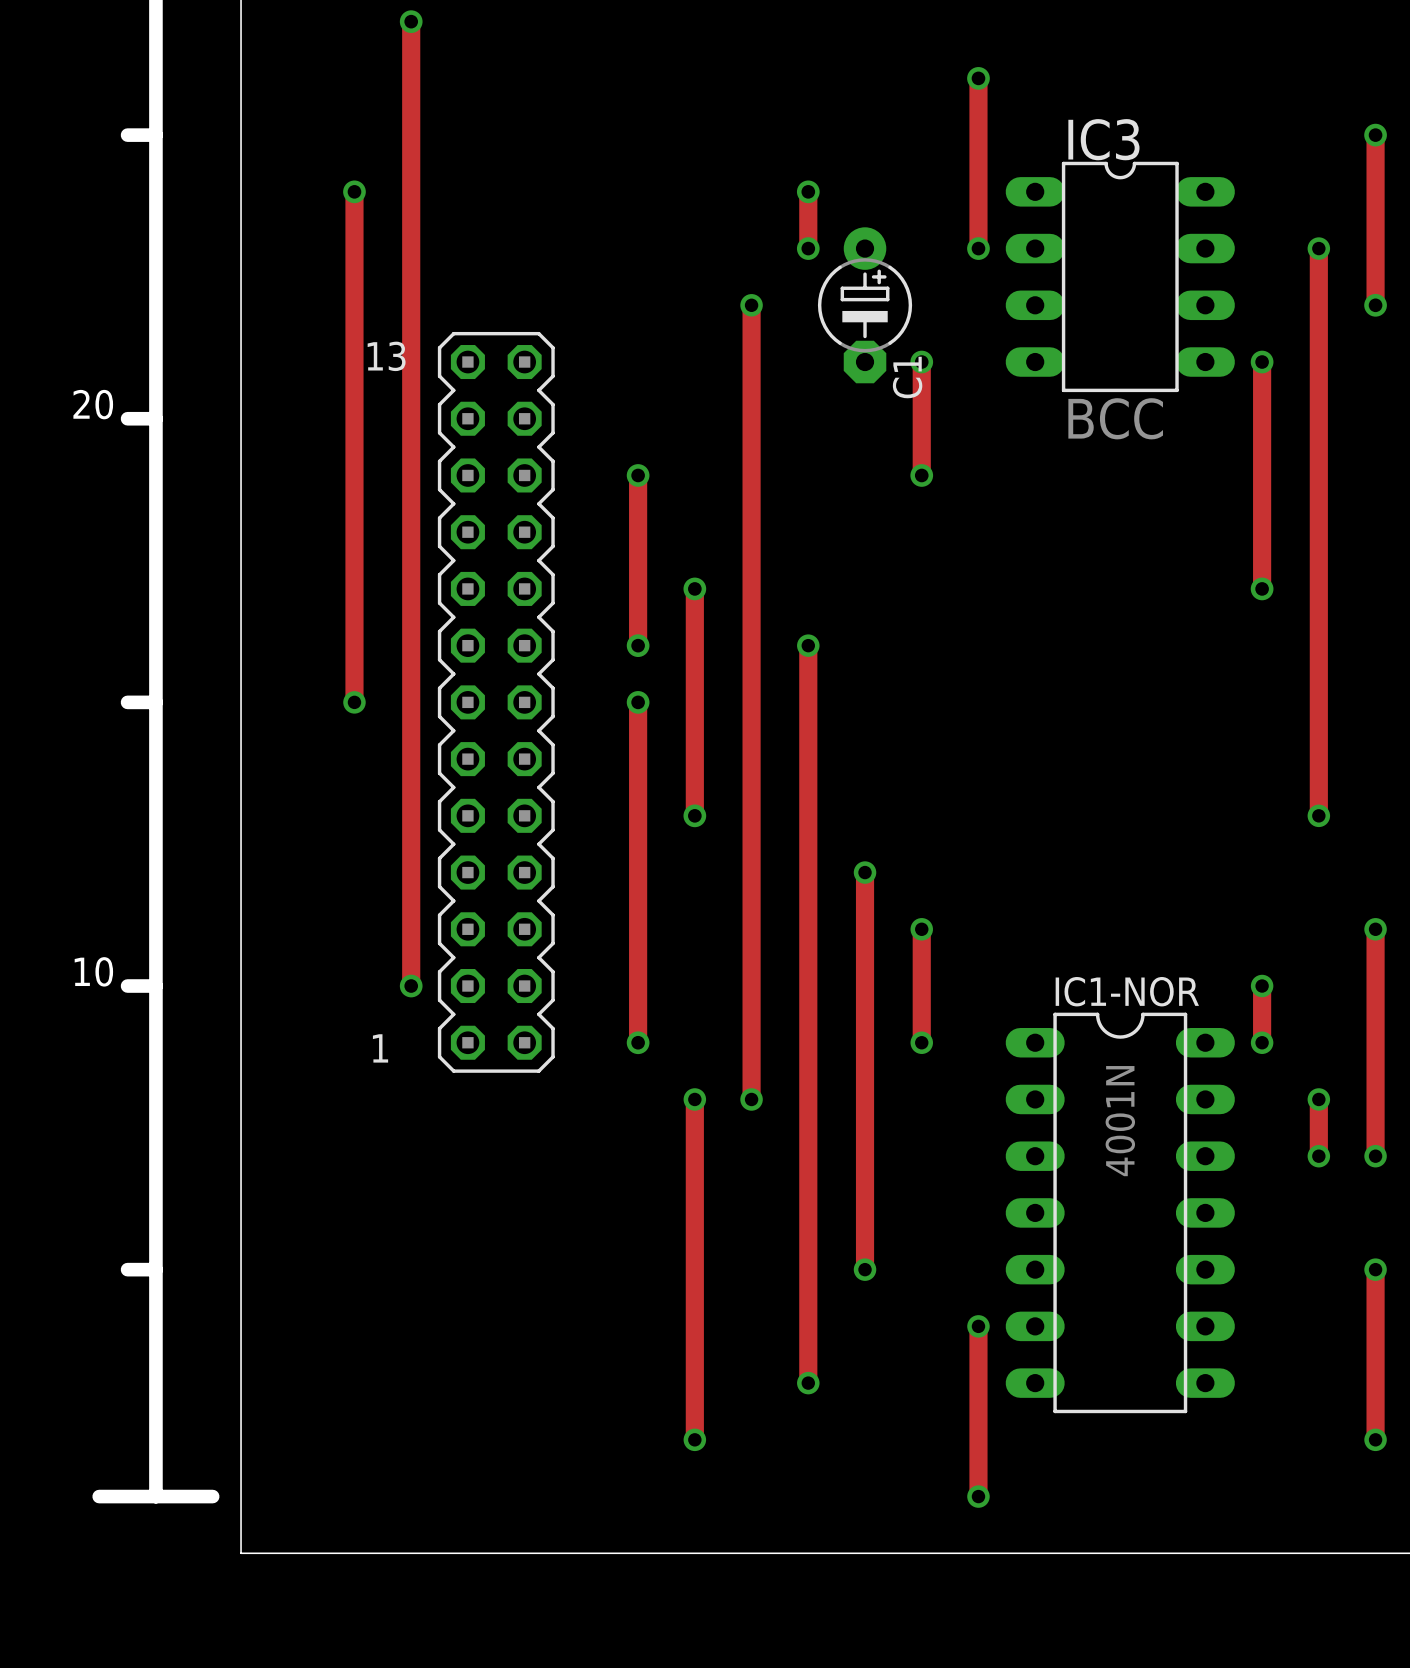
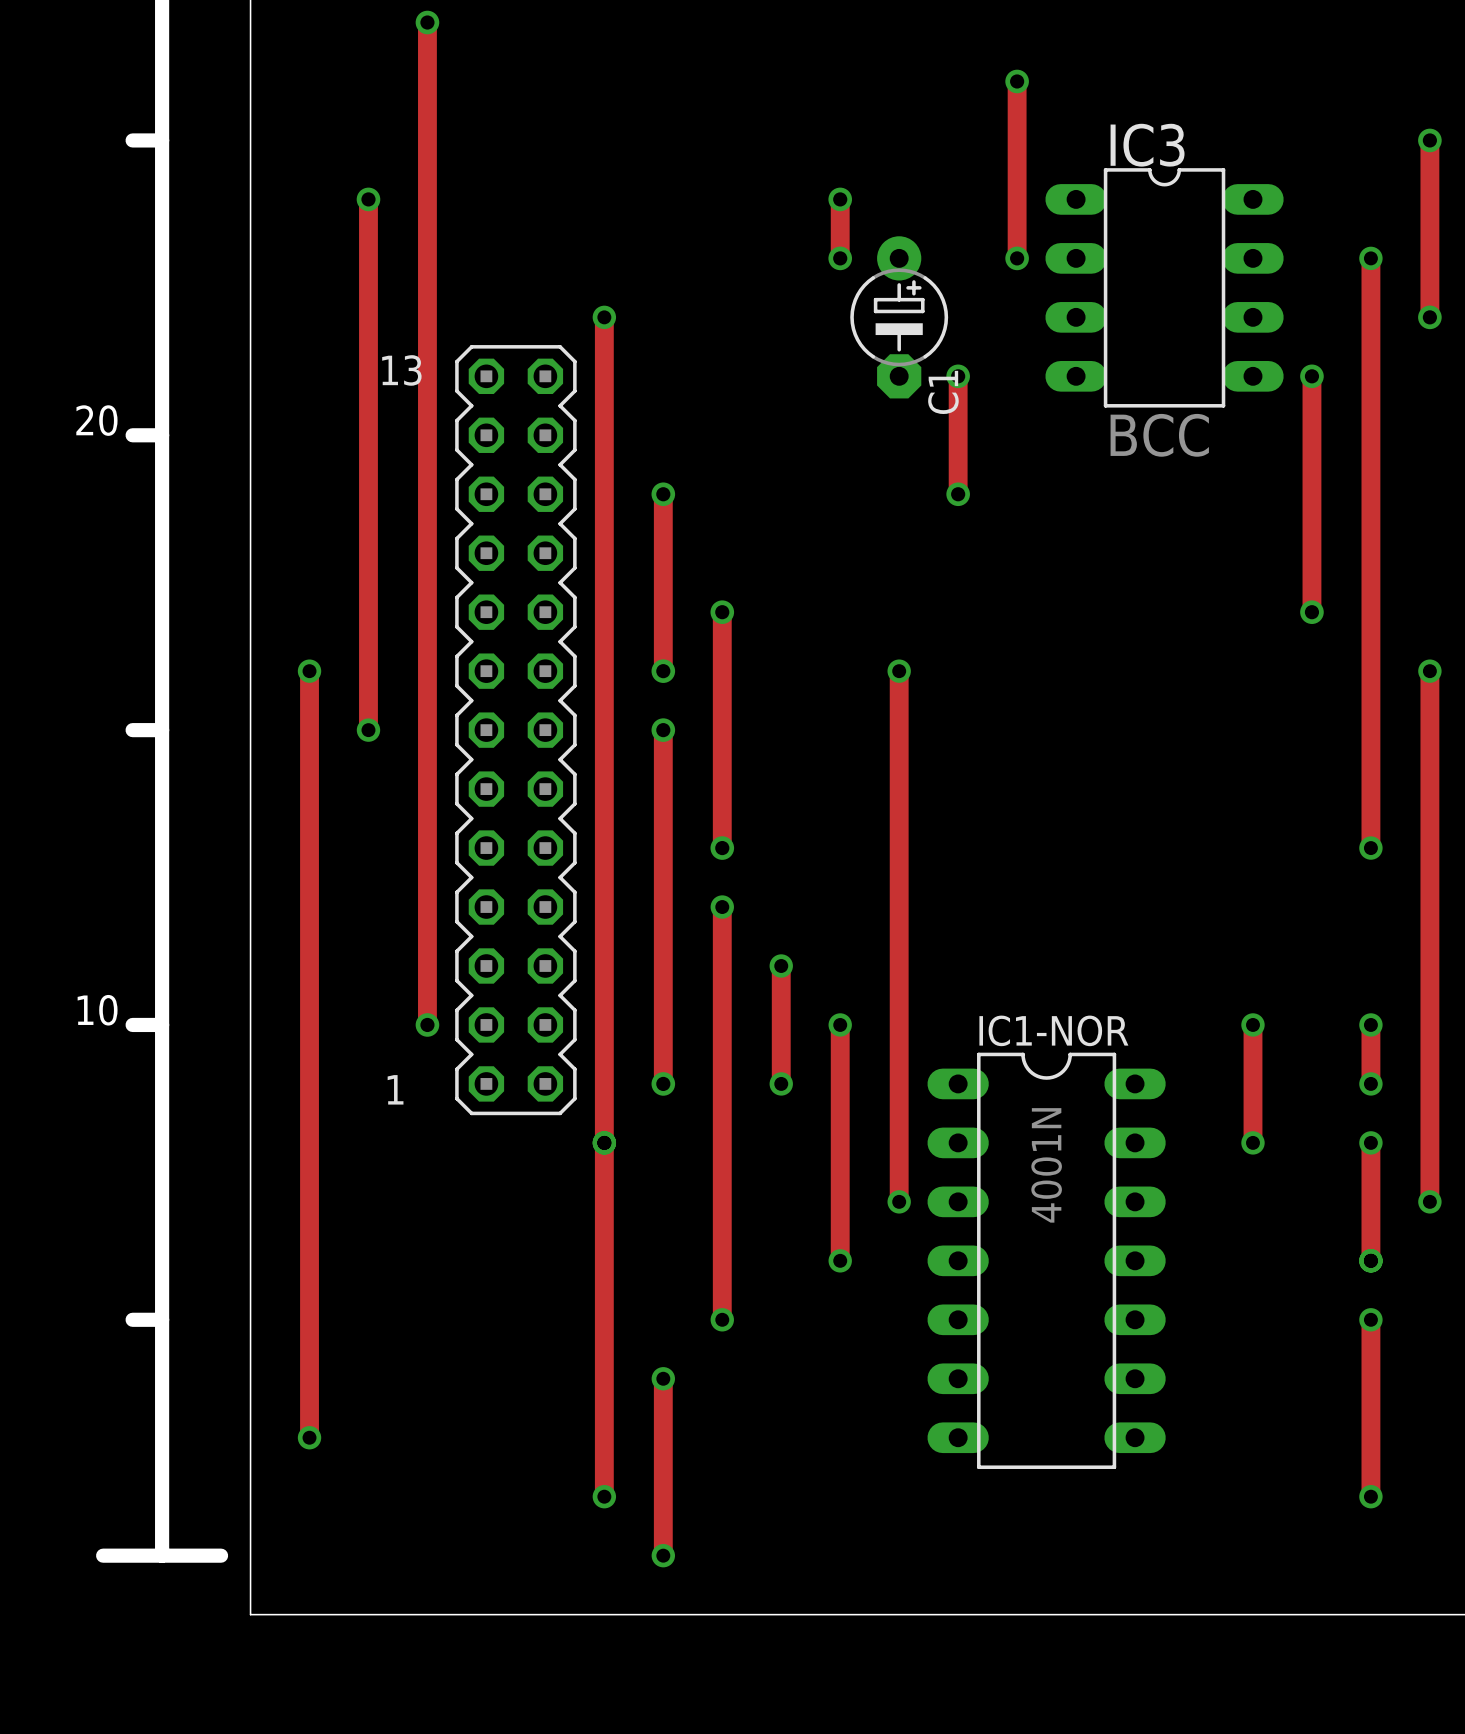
track: none -> (604, 317) (604, 1496)
via: none -> (604, 317)
track: (751, 305) (751, 929) -> none
via: (751, 305) -> none
track: none -> (309, 671) (309, 1437)
via: none -> (309, 671)
track: (808, 645) (808, 986) -> none
via position: (808, 645) -> (899, 671)
track: none -> (899, 671) (899, 907)
track: none -> (1429, 671) (1429, 965)
via: none -> (1429, 671)
track: none -> (722, 907) (722, 1142)
via: none -> (722, 907)
via: (865, 872) -> none
via: none -> (781, 965)
track: (921, 929) (921, 1042) -> (1252, 1024) (1252, 1142)
via: (921, 929) -> none
via: (1375, 929) -> none
via: none -> (840, 1024)
via: none -> (1252, 1024)
track: (1262, 986) (1262, 1042) -> (1370, 1024) (1370, 1083)
via: (1262, 986) -> none
via: none -> (1370, 1024)
track: (751, 1042) (751, 1099) -> none
via: none -> (781, 1083)
via: (921, 1042) -> none
via: (1262, 1042) -> none
via: none -> (1370, 1083)
via: none -> (604, 1142)
via: (694, 1099) -> none
via: (751, 1099) -> none
via: none -> (1252, 1142)
track: (865, 1156) (865, 1269) -> none
via: none -> (899, 1201)
track: none -> (1370, 1201) (1370, 1260)
via: (1318, 1156) -> none
track: (808, 1212) (808, 1383) -> none
via: none -> (840, 1260)
IC1-NOR position: (1120, 1212) -> (1046, 1260)
via: none -> (1370, 1260)
track: (694, 1269) (694, 1439) -> (663, 1378) (663, 1555)
via: none -> (722, 1319)
via: (865, 1269) -> none
via: none -> (1370, 1319)
track: (1375, 1269) (1375, 1439) -> (1370, 1319) (1370, 1496)
via: (1375, 1269) -> none
via: none -> (663, 1378)
track: (978, 1326) (978, 1496) -> none
via: (978, 1326) -> none
via: none -> (309, 1437)
via: (808, 1383) -> none
via: none -> (604, 1496)
via: (694, 1439) -> none
via position: (1375, 1439) -> (1370, 1496)
via: none -> (663, 1555)
via: (978, 1496) -> none

